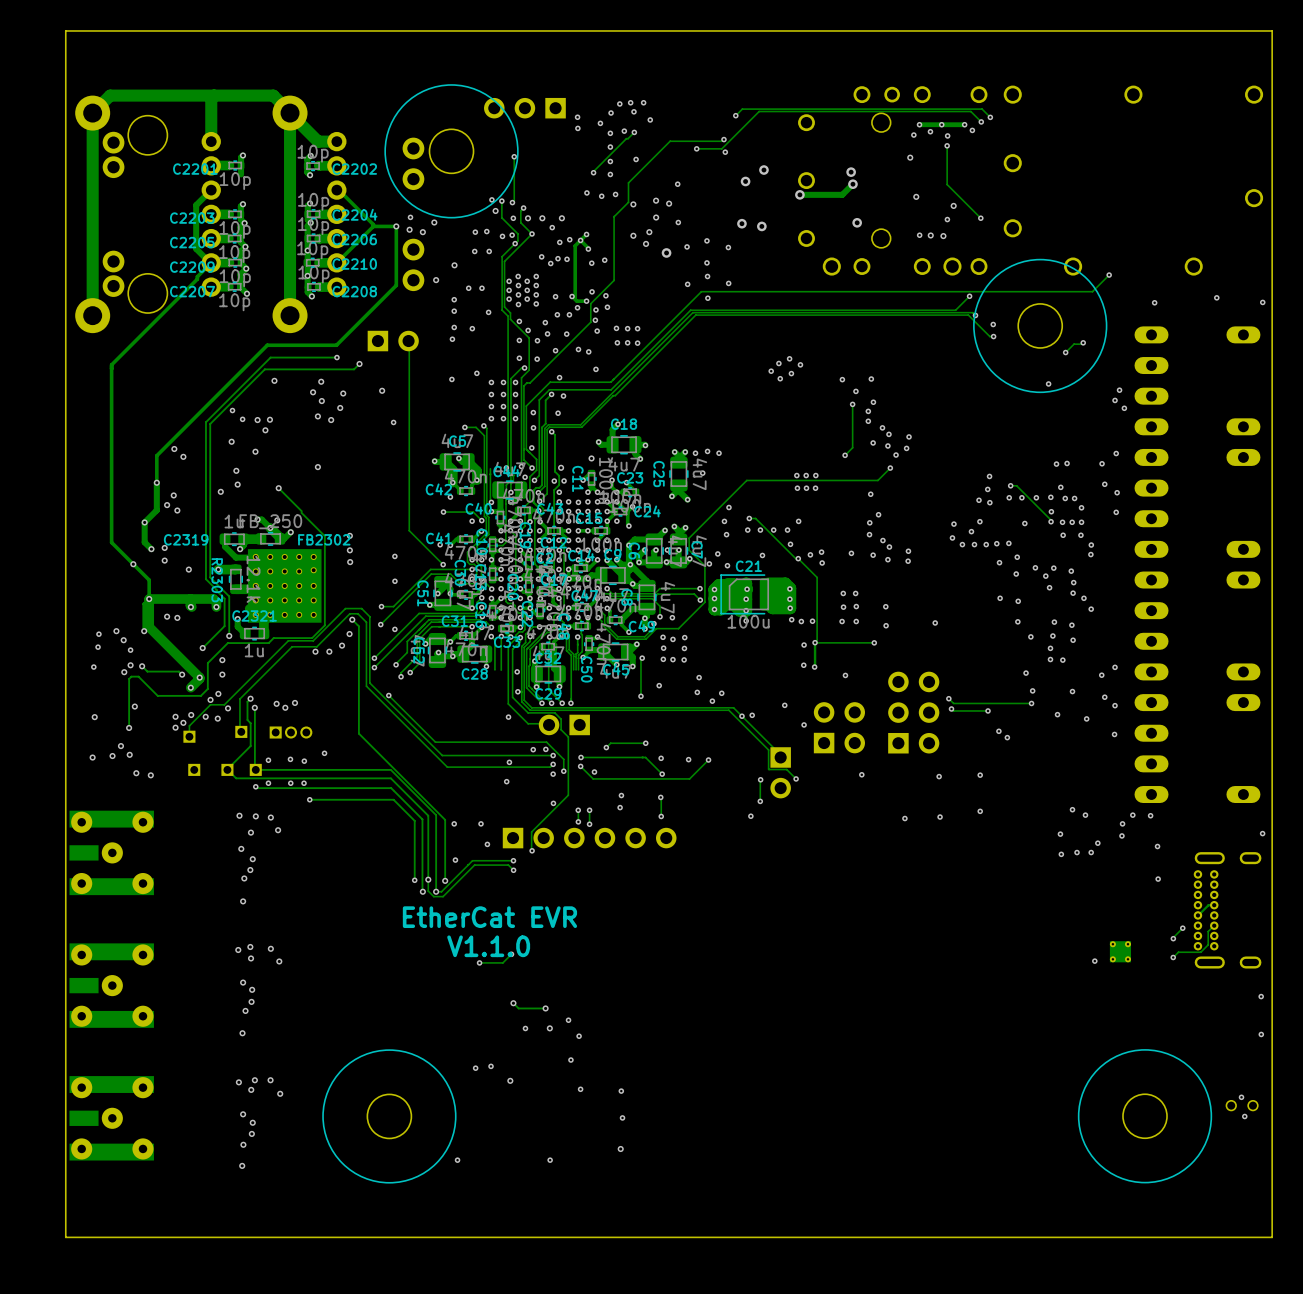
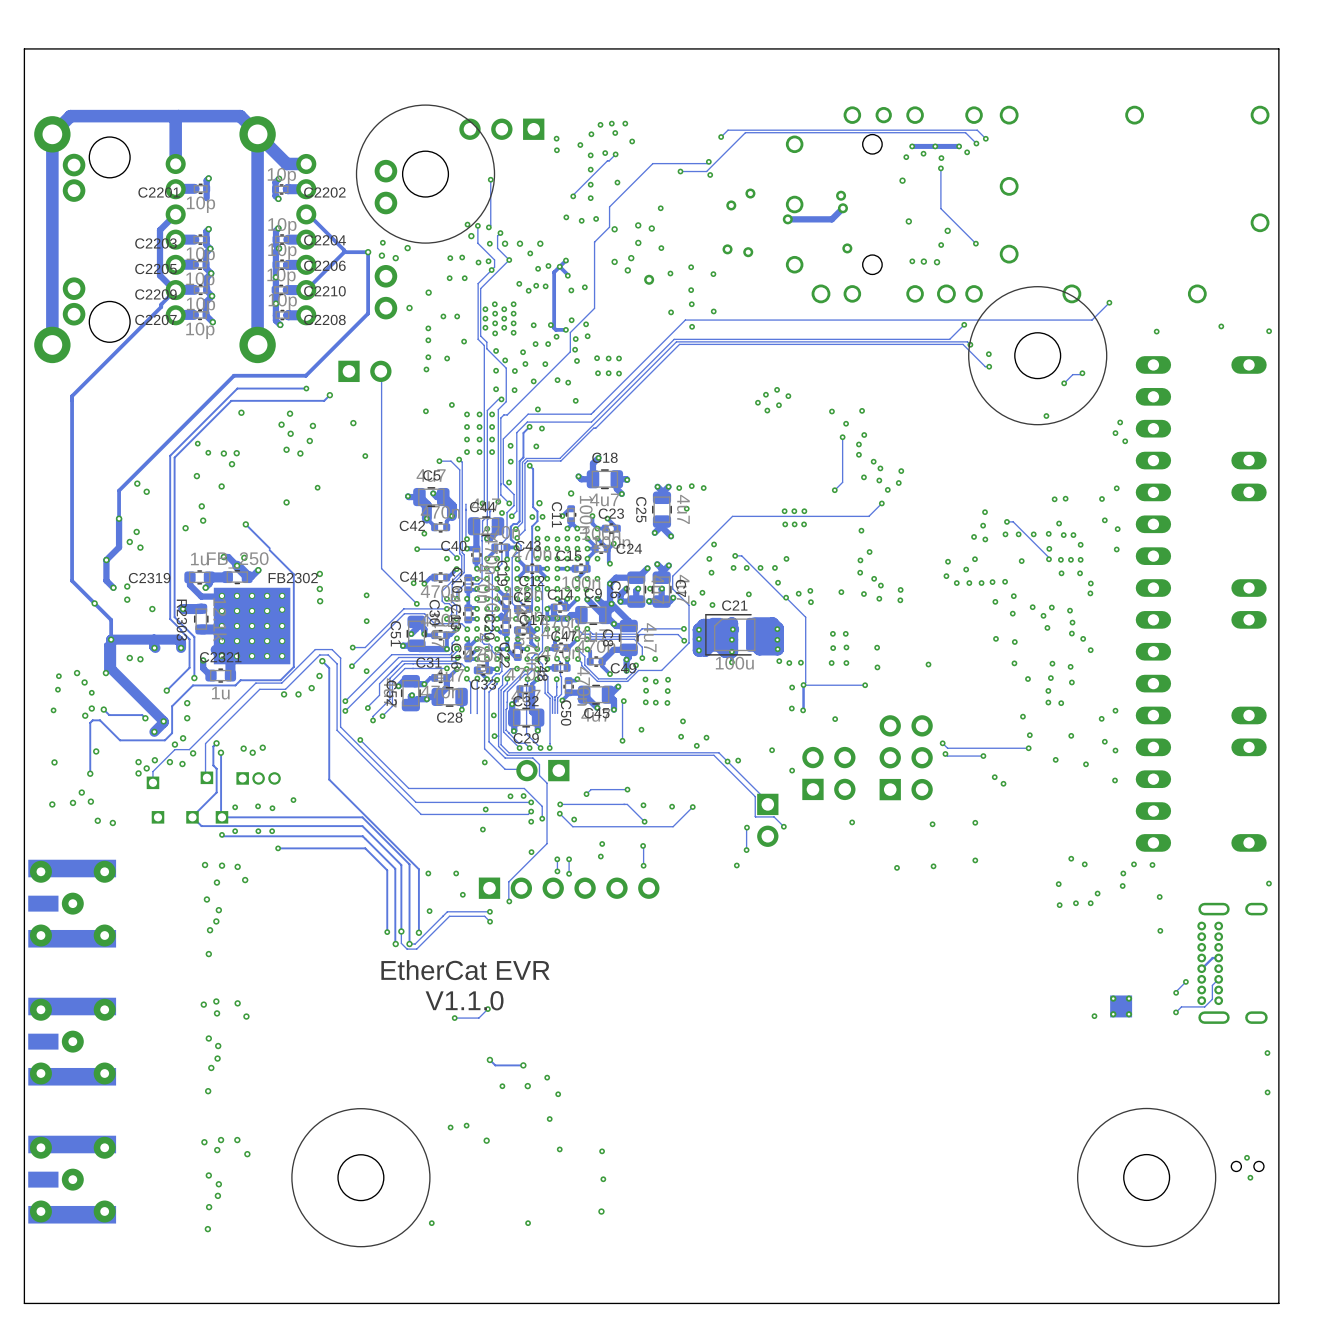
via: none -> (317, 487)

